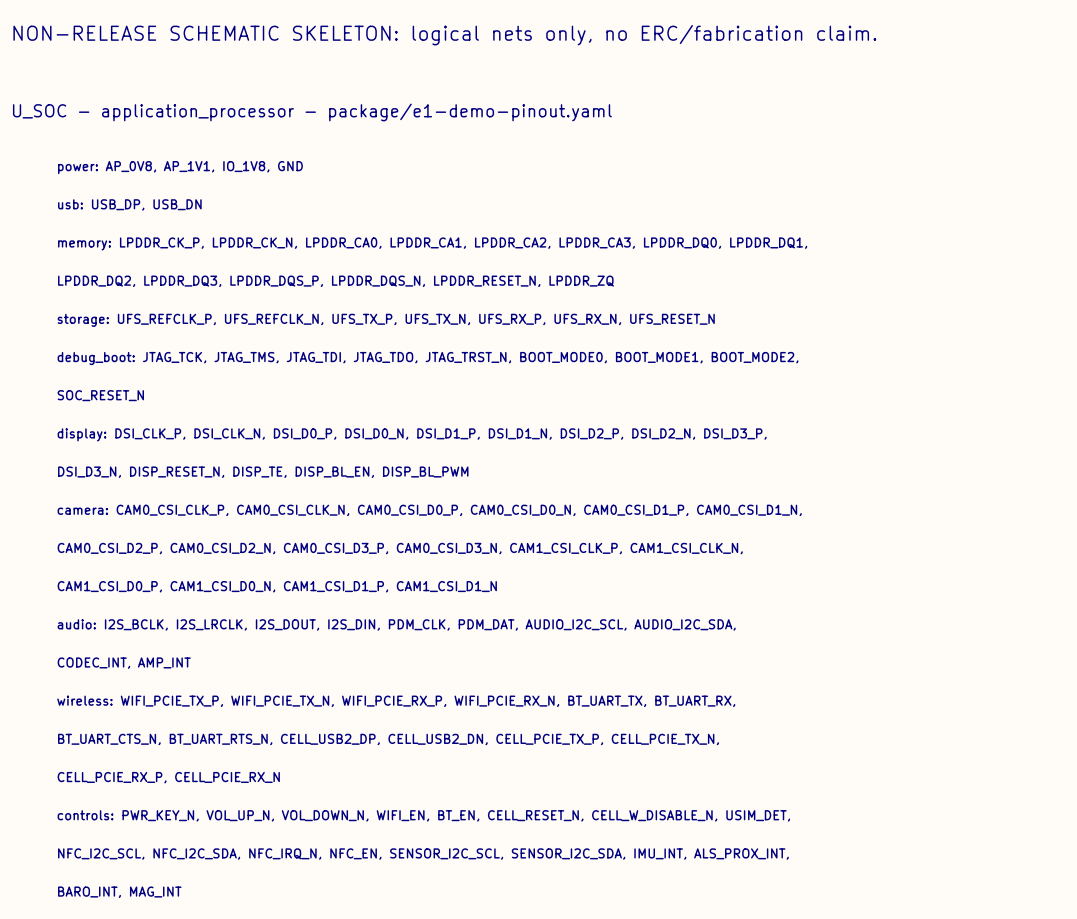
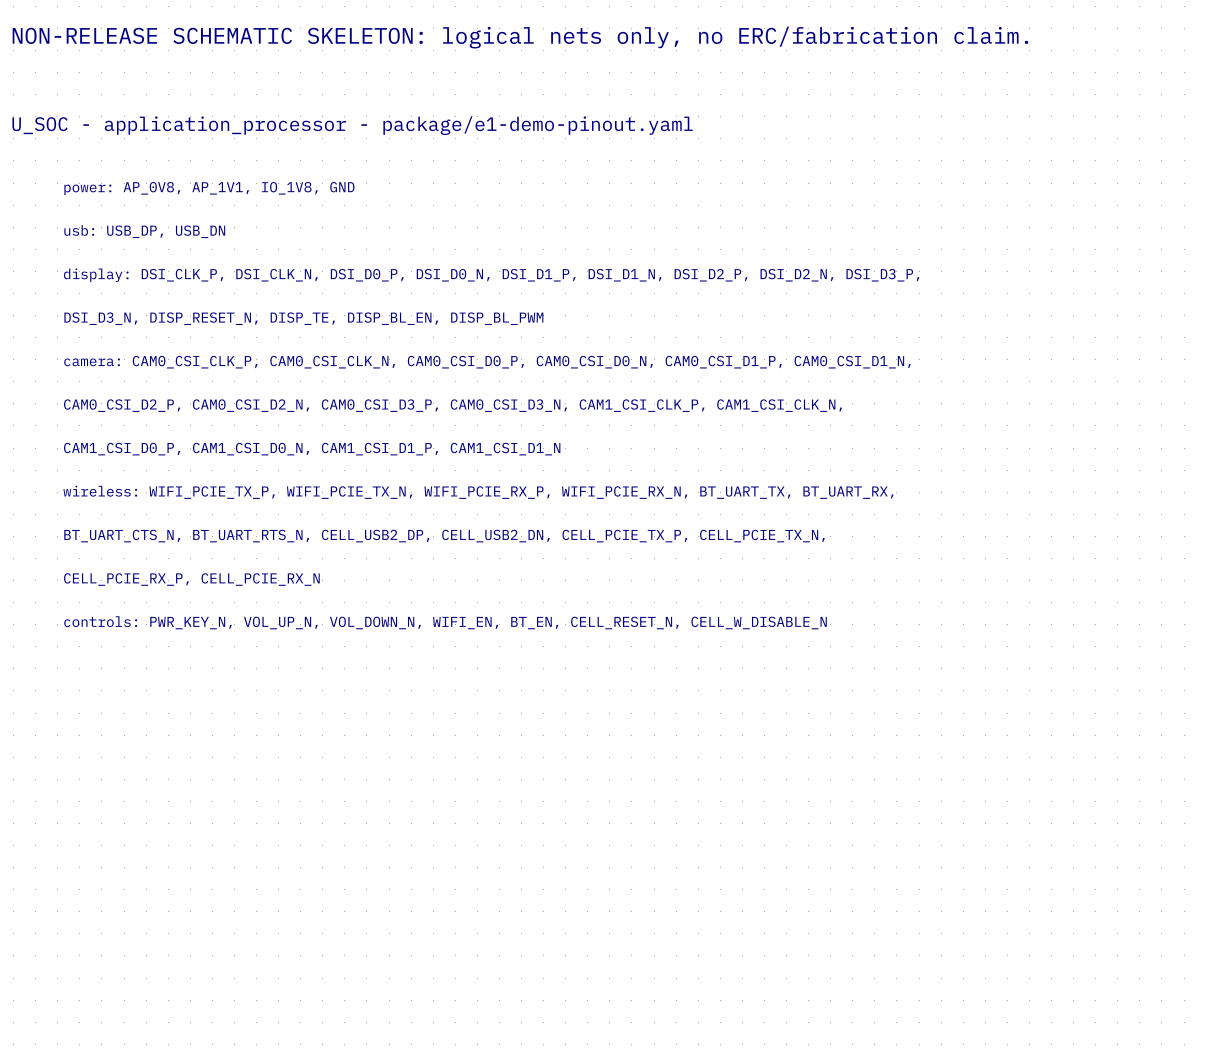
text: memory: LPDDR_CK_P, LPDDR_CK_N, LPDDR_CA0, LPDDR_CA1, LPDDR_CA2, LPDDR_CA3, LPDDR_DQ0, LPDDR_DQ1, (432, 243) -> display: DSI_CLK_P, DSI_CLK_N, DSI_D0_P, DSI_D0_N, DSI_D1_P, DSI_D1_N, DSI_D2_P, DSI_D2_N, DSI_D3_P, (491, 275)
text: LPDDR_DQ2, LPDDR_DQ3, LPDDR_DQS_P, LPDDR_DQS_N, LPDDR_RESET_N, LPDDR_ZQ (336, 281) -> DSI_D3_N, DISP_RESET_N, DISP_TE, DISP_BL_EN, DISP_BL_PWM (303, 318)
text: storage: UFS_REFCLK_P, UFS_REFCLK_N, UFS_TX_P, UFS_TX_N, UFS_RX_P, UFS_RX_N, UFS_RESET_N (386, 320) -> camera: CAM0_CSI_CLK_P, CAM0_CSI_CLK_N, CAM0_CSI_D0_P, CAM0_CSI_D0_N, CAM0_CSI_D1_P, CAM0_CSI_D1_N, (487, 362)
text: debug_boot: JTAG_TCK, JTAG_TMS, JTAG_TDI, JTAG_TDO, JTAG_TRST_N, BOOT_MODE0, BOOT_MODE1, BOOT_MODE2, (428, 358) -> CAM0_CSI_D2_P, CAM0_CSI_D2_N, CAM0_CSI_D3_P, CAM0_CSI_D3_N, CAM1_CSI_CLK_P, CAM1_CSI_CLK_N, (453, 405)
text: SOC_RESET_N (100, 395) -> CAM1_CSI_D0_P, CAM1_CSI_D0_N, CAM1_CSI_D1_P, CAM1_CSI_D1_N (312, 449)
text: display: DSI_CLK_P, DSI_CLK_N, DSI_D0_P, DSI_D0_N, DSI_D1_P, DSI_D1_N, DSI_D2_P, DSI_D2_N, DSI_D3_P, (412, 434) -> wireless: WIFI_PCIE_TX_P, WIFI_PCIE_TX_N, WIFI_PCIE_RX_P, WIFI_PCIE_RX_N, BT_UART_TX, BT_UART_RX, (478, 492)
text: DSI_D3_N, DISP_RESET_N, DISP_TE, DISP_BL_EN, DISP_BL_PWM (263, 472) -> BT_UART_CTS_N, BT_UART_RTS_N, CELL_USB2_DP, CELL_USB2_DN, CELL_PCIE_TX_P, CELL_PCIE_TX_N, (444, 536)
text: camera: CAM0_CSI_CLK_P, CAM0_CSI_CLK_N, CAM0_CSI_D0_P, CAM0_CSI_D0_N, CAM0_CSI_D1_P, CAM0_CSI_D1_N, (429, 510) -> CELL_PCIE_RX_P, CELL_PCIE_RX_N (191, 579)
text: CAM0_CSI_D2_P, CAM0_CSI_D2_N, CAM0_CSI_D3_P, CAM0_CSI_D3_N, CAM1_CSI_CLK_P, CAM1_CSI_CLK_N, (400, 548) -> controls: PWR_KEY_N, VOL_UP_N, VOL_DOWN_N, WIFI_EN, BT_EN, CELL_RESET_N, CELL_W_DISABLE_N (445, 622)
text: CAM1_CSI_D0_P, CAM1_CSI_D0_N, CAM1_CSI_D1_P, CAM1_CSI_D1_N (277, 586) -> none
text: audio: I2S_BCLK, I2S_LRCLK, I2S_DOUT, I2S_DIN, PDM_CLK, PDM_DAT, AUDIO_I2C_SCL, AUDIO_I2C_SDA, (396, 624) -> none
text: CODEC_INT, AMP_INT (124, 663) -> none
text: wireless: WIFI_PCIE_TX_P, WIFI_PCIE_TX_N, WIFI_PCIE_RX_P, WIFI_PCIE_RX_N, BT_UART_TX, BT_UART_RX, (396, 701) -> none
text: BT_UART_CTS_N, BT_UART_RTS_N, CELL_USB2_DP, CELL_USB2_DN, CELL_PCIE_TX_P, CELL_PCIE_TX_N, (388, 739) -> none
text: CELL_PCIE_RX_P, CELL_PCIE_RX_N (168, 777) -> none
text: controls: PWR_KEY_N, VOL_UP_N, VOL_DOWN_N, WIFI_EN, BT_EN, CELL_RESET_N, CELL_W_DISABLE_N, USIM_DET, (423, 815) -> none
text: NFC_I2C_SCL, NFC_I2C_SDA, NFC_IRQ_N, NFC_EN, SENSOR_I2C_SCL, SENSOR_I2C_SDA, IMU_INT, ALS_PROX_INT, (423, 854) -> none
text: BARO_INT, MAG_INT (119, 892) -> none

